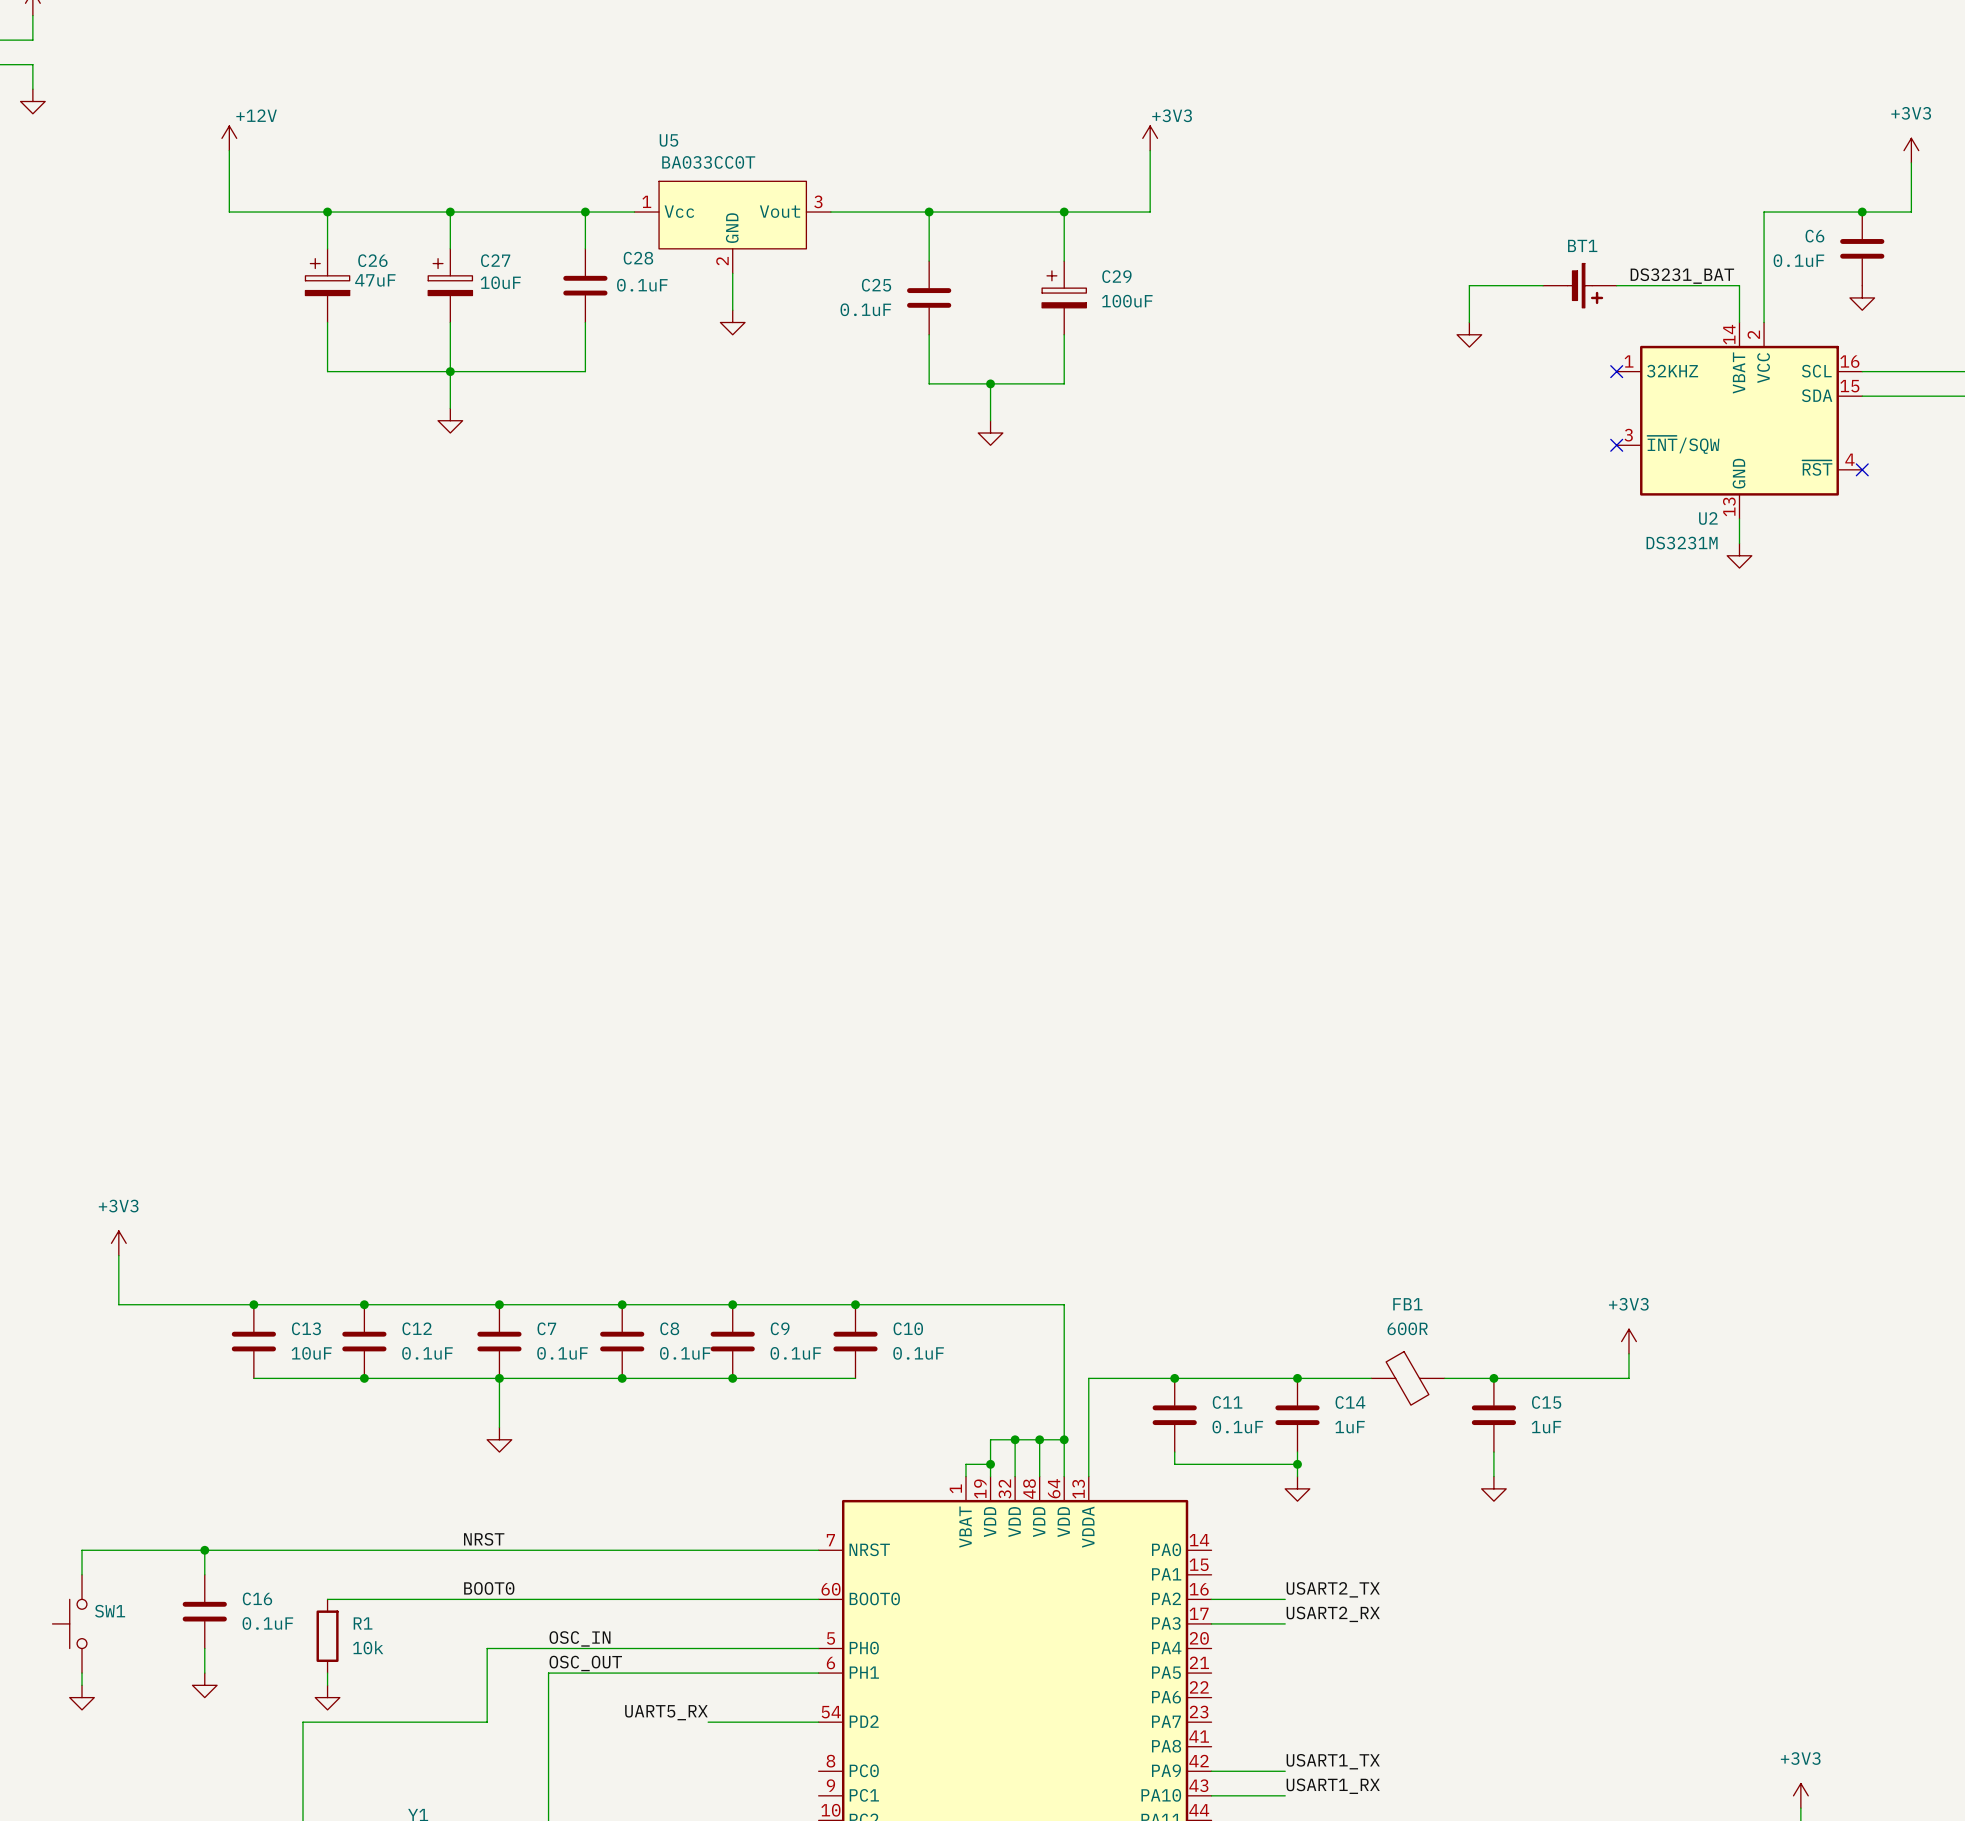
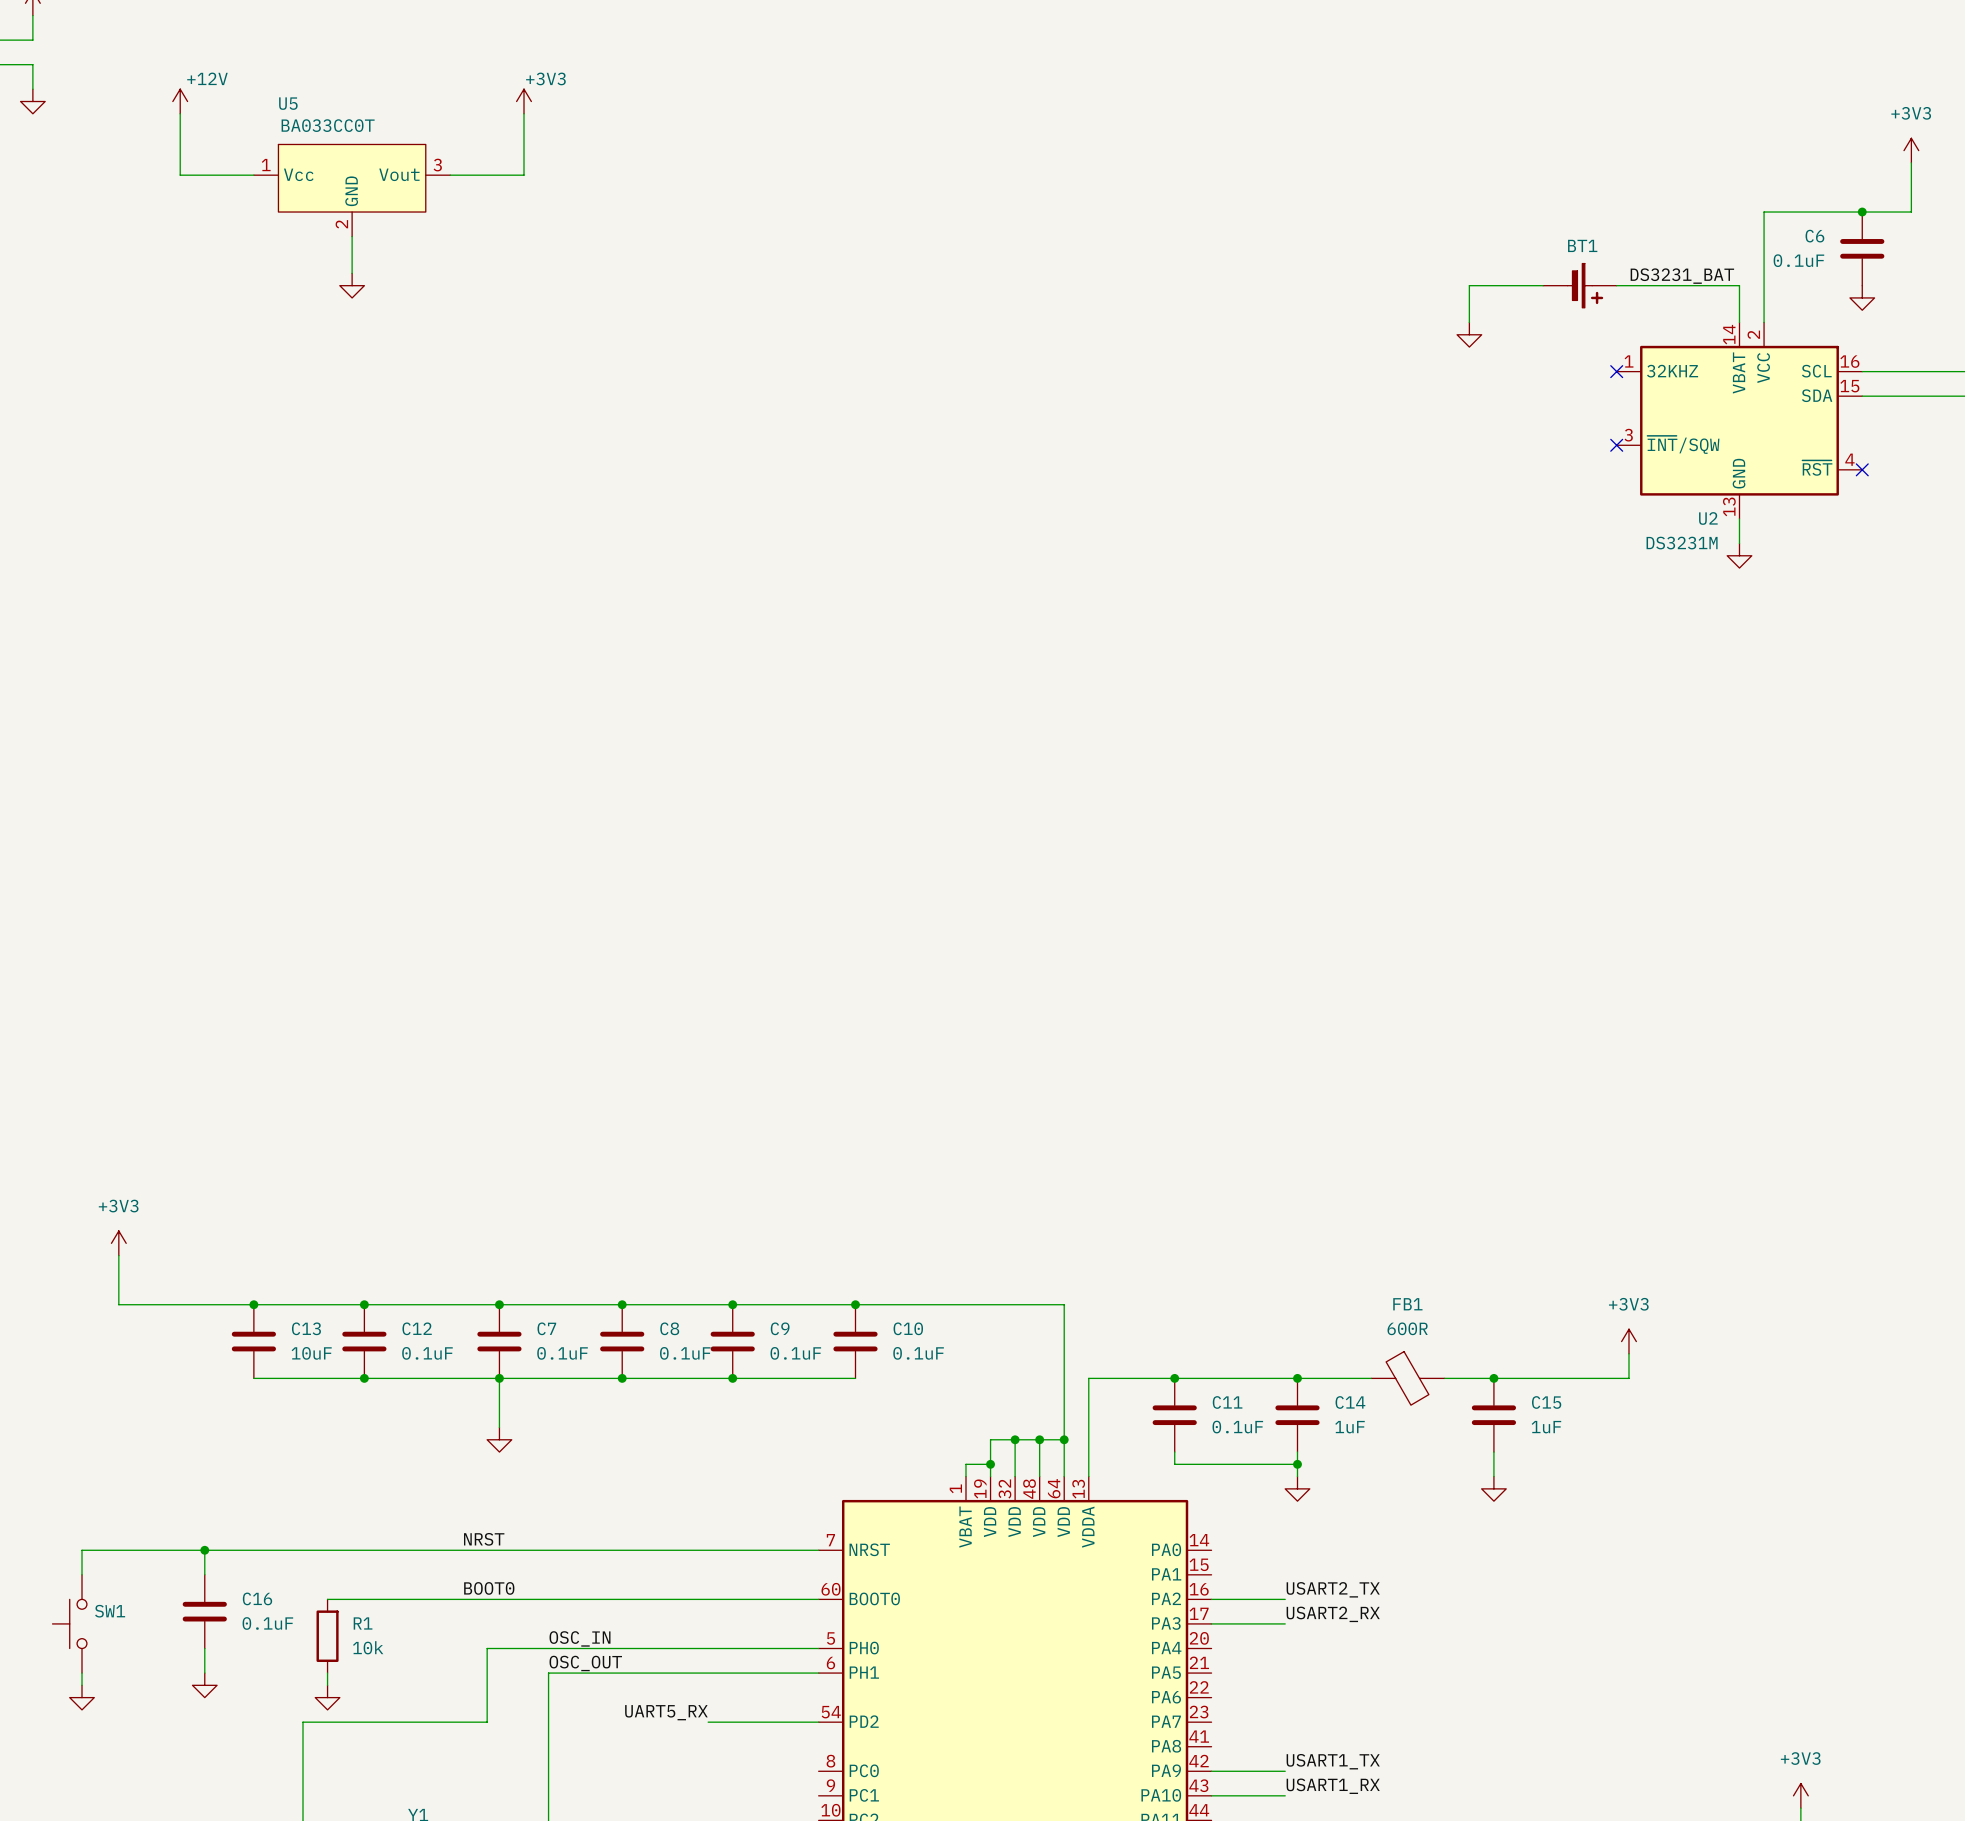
power symbol: none -> +3V3 (523, 101)
wire: none -> (180, 113) (180, 175) (253, 175)
wire: none -> (523, 113) (523, 175) (450, 175)
power symbol position: +12V (229, 138) -> +12V (180, 101)
power symbol: +3V3 (1150, 138) -> none
wire: (229, 150) (229, 212) (634, 212) -> none
wire: (1150, 150) (1150, 212) (830, 212) -> none
wire: (327, 212) (327, 248) -> (352, 236) (352, 273)
junction: (327, 212) -> none
wire: (450, 212) (450, 248) -> none
junction: (450, 212) -> none
wire: (585, 212) (585, 248) -> none
junction: (585, 212) -> none
wire: (929, 212) (929, 261) -> none
junction: (929, 212) -> none
wire: (1064, 212) (1064, 261) -> none
junction: (1064, 212) -> none
U5 position: (732, 227) -> (352, 190)
wire: (732, 273) (732, 310) -> none
C26: 47uF (327, 285) -> none
C27: 10uF (450, 285) -> none
C28: 0.1uF (585, 285) -> none
C25: 0.1uF (929, 297) -> none
C29: 100uF (1064, 297) -> none
wire: (327, 322) (327, 371) (585, 371) (585, 322) -> none
wire: (450, 322) (450, 408) -> none
power symbol: (732, 322) -> none
wire: (929, 334) (929, 383) (1064, 383) (1064, 334) -> none
junction: (450, 371) -> none
wire: (990, 383) (990, 420) -> none
junction: (990, 383) -> none
power symbol position: (450, 420) -> (352, 285)
power symbol: (990, 433) -> none

